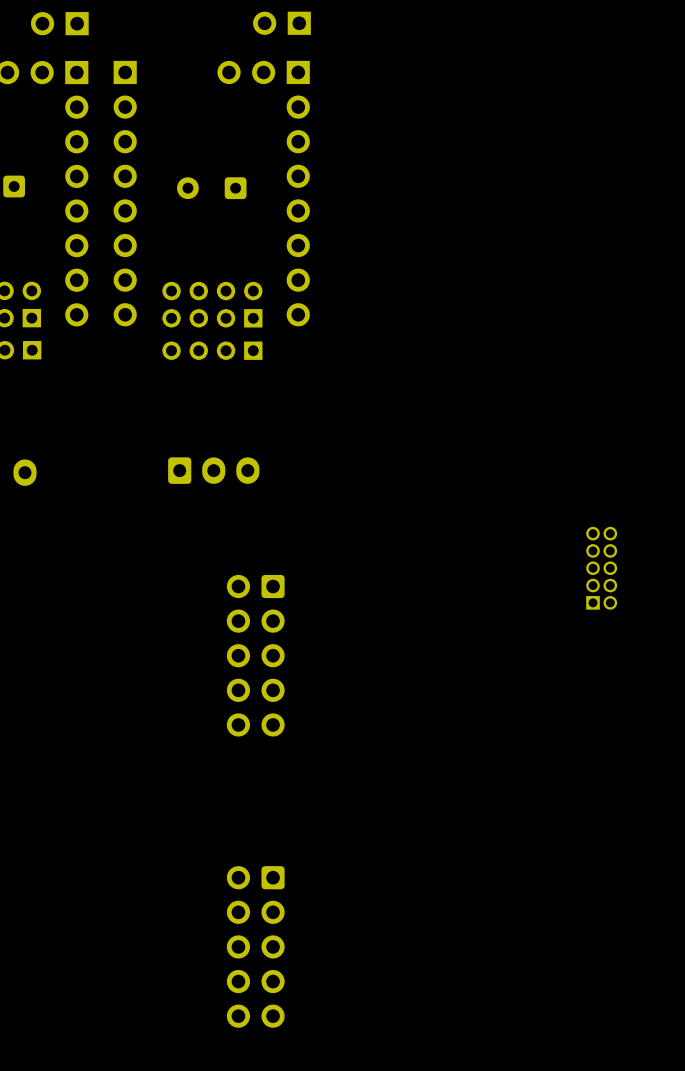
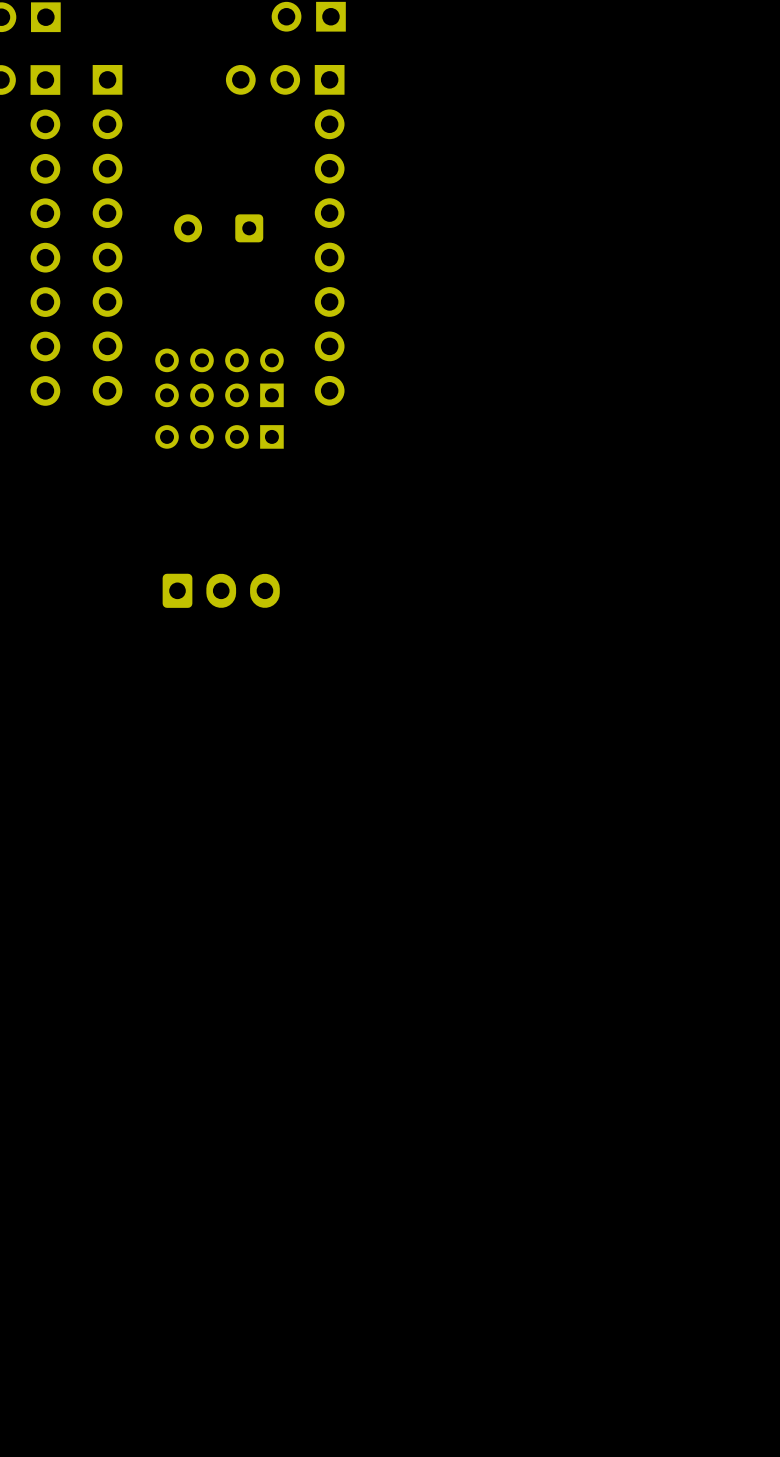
part: (601, 568) -> none
part: (255, 655) -> none
part: (255, 946) -> none

